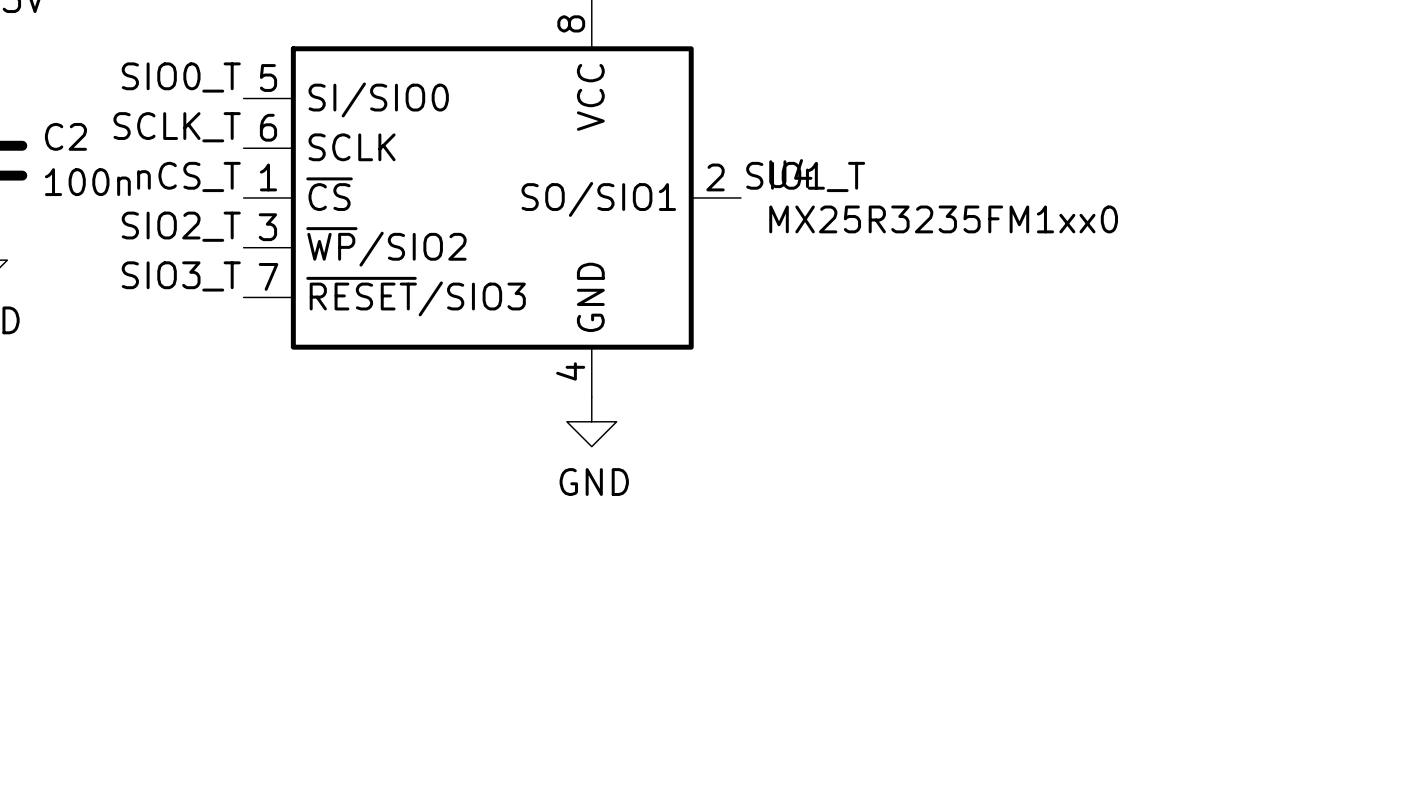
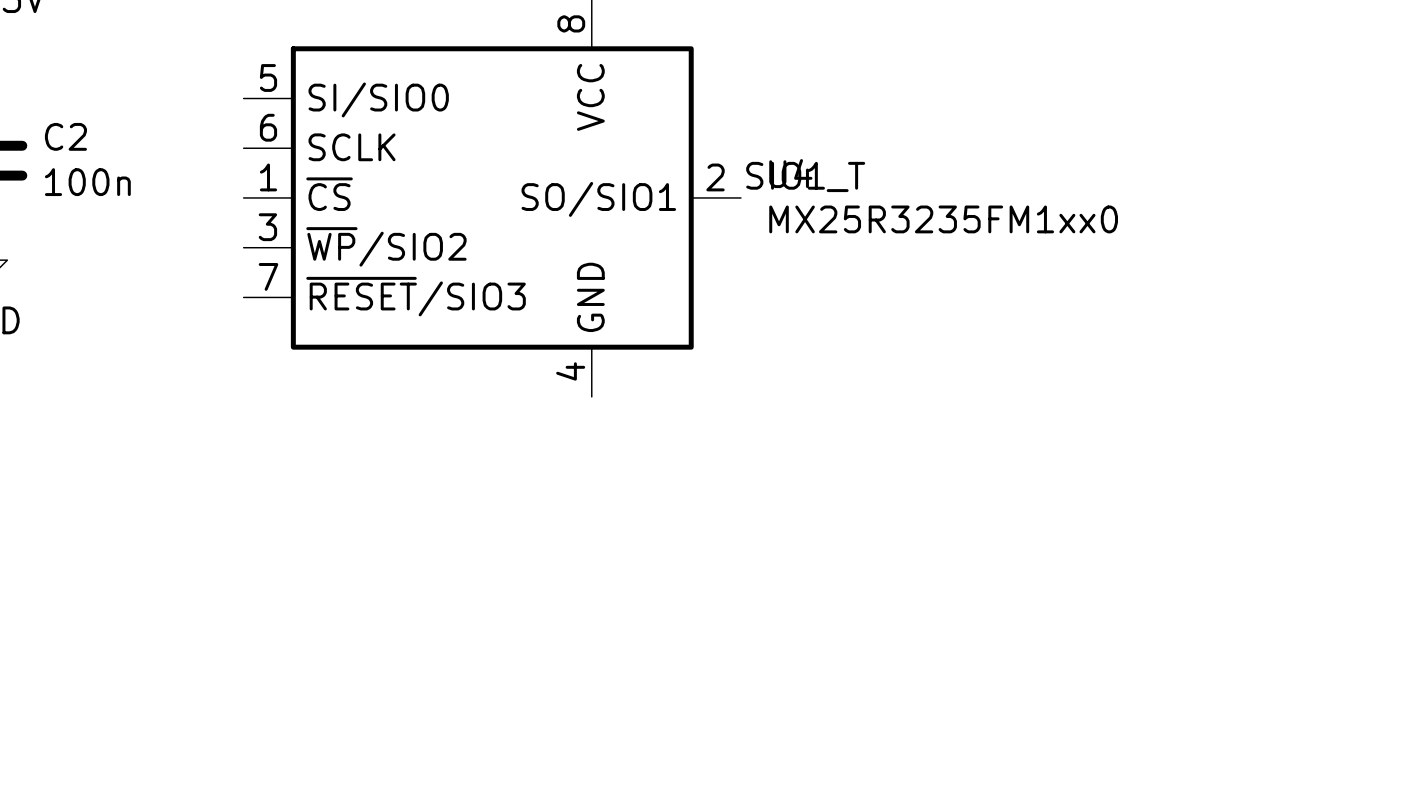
label: SIO0_T (181, 77) -> none
label: SCLK_T (177, 127) -> none
label: nCS_T (188, 176) -> none
label: SIO2_T (181, 226) -> none
label: SIO3_T (181, 276) -> none
power symbol: GND (591, 421) -> none

